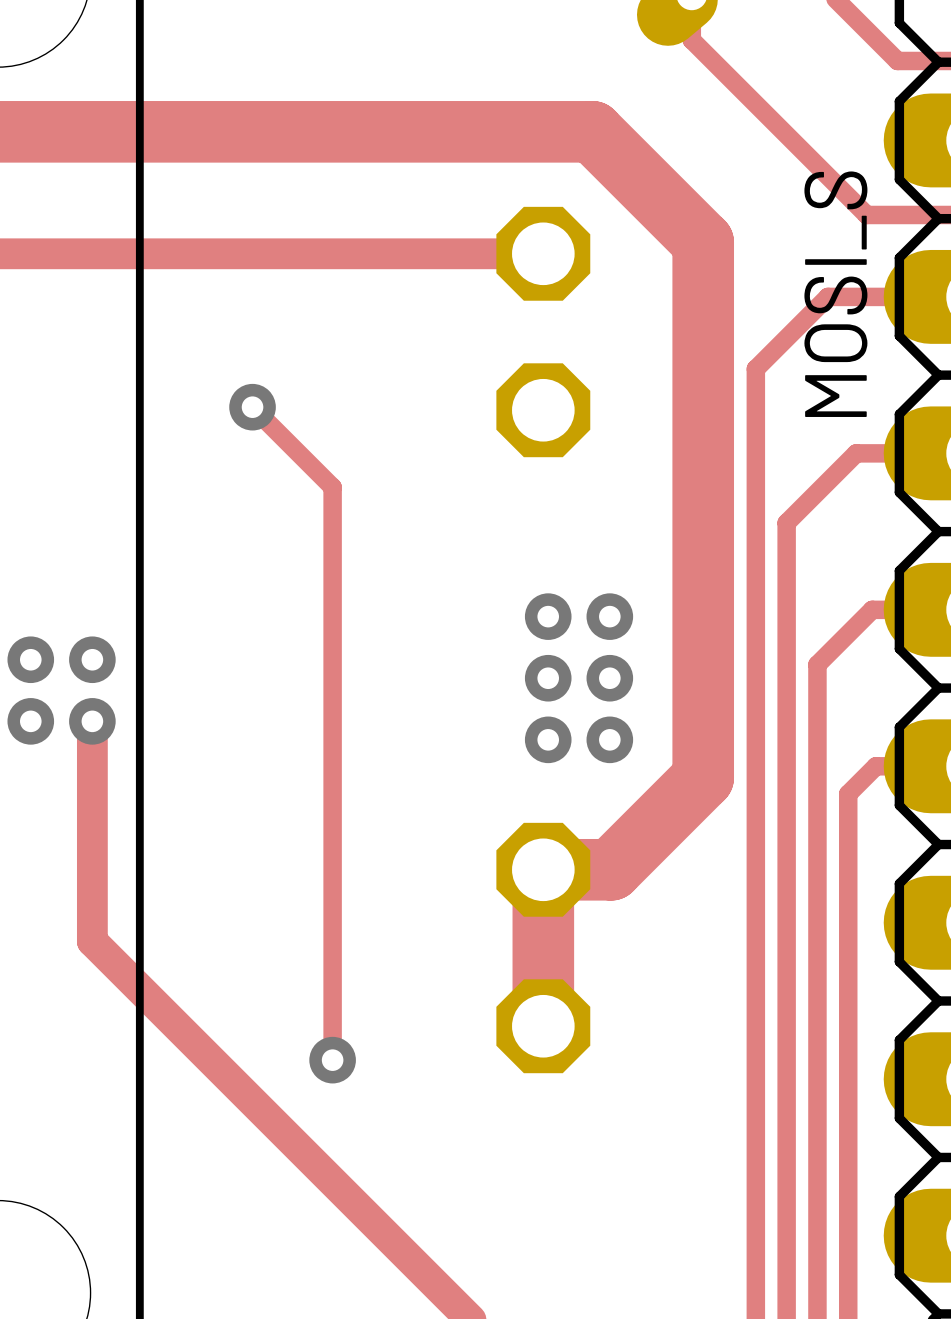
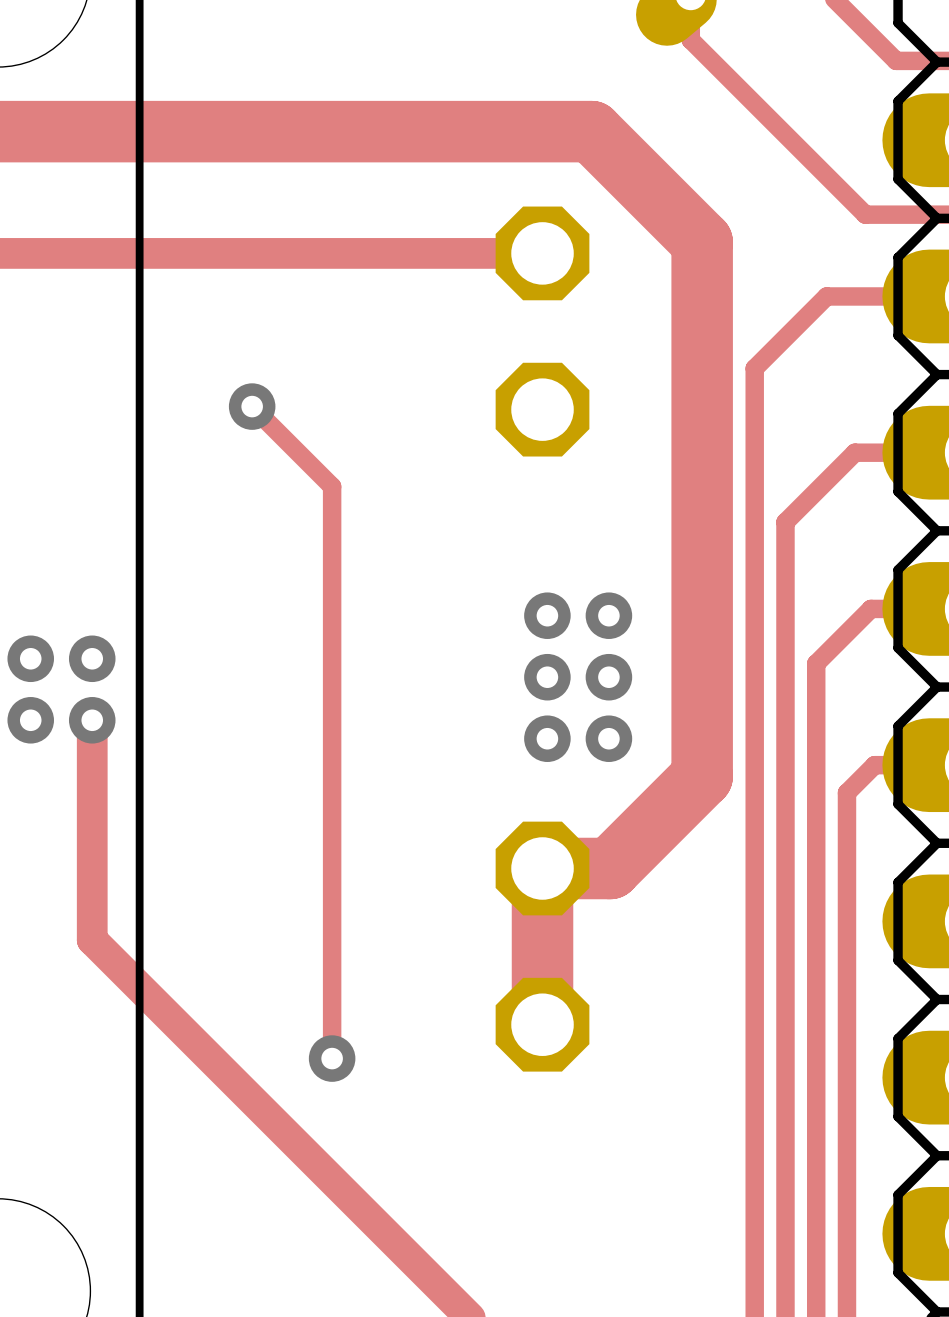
text: MOSI_S (835, 294) -> none

